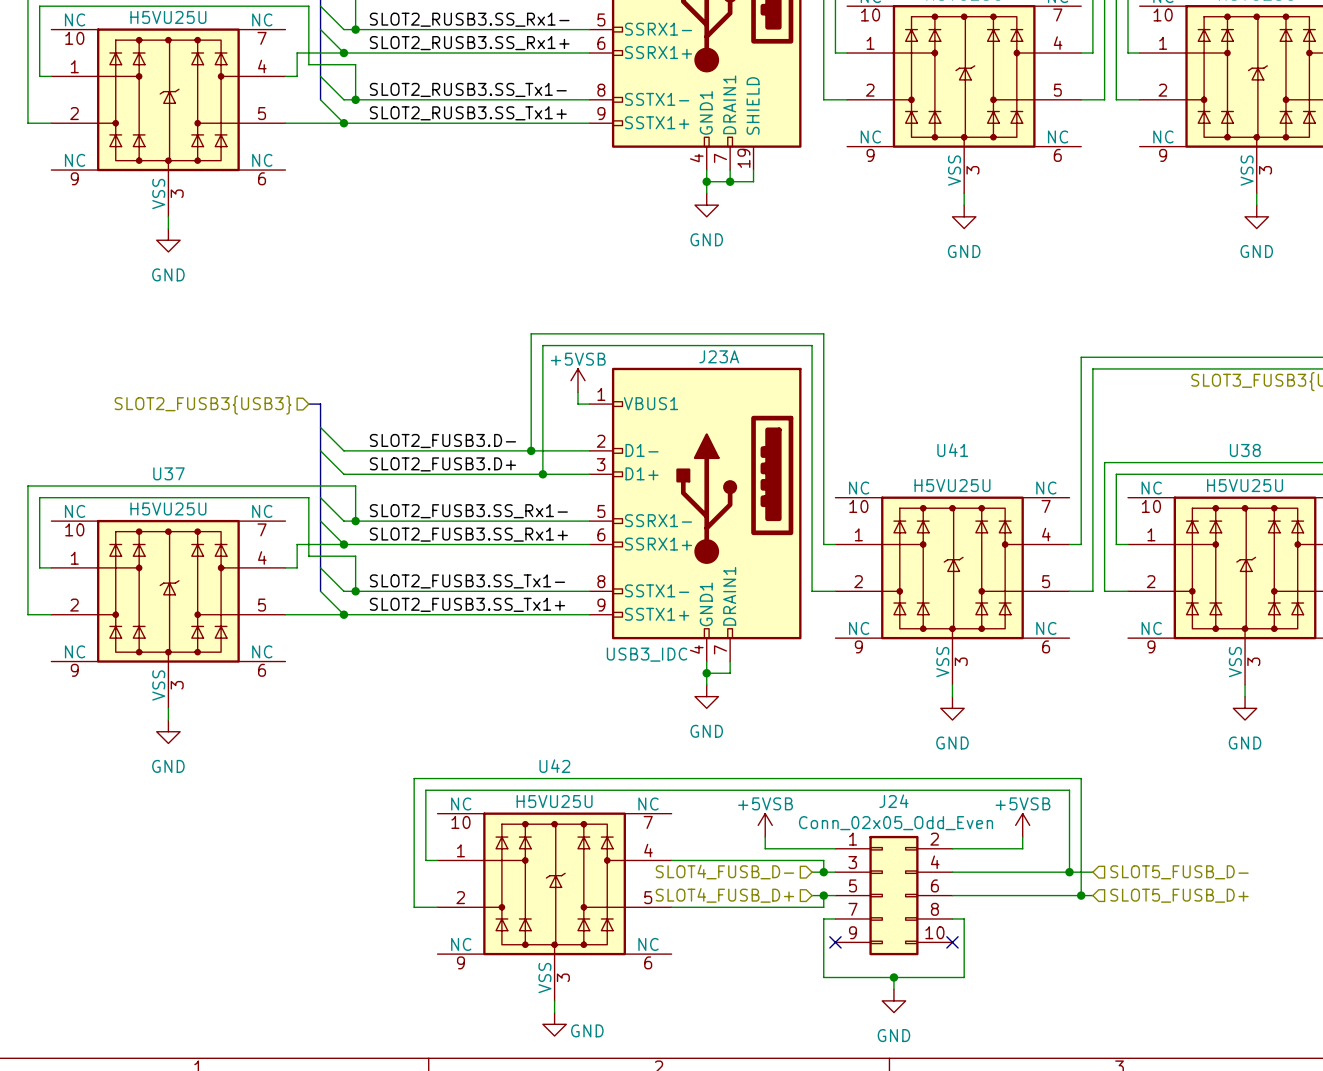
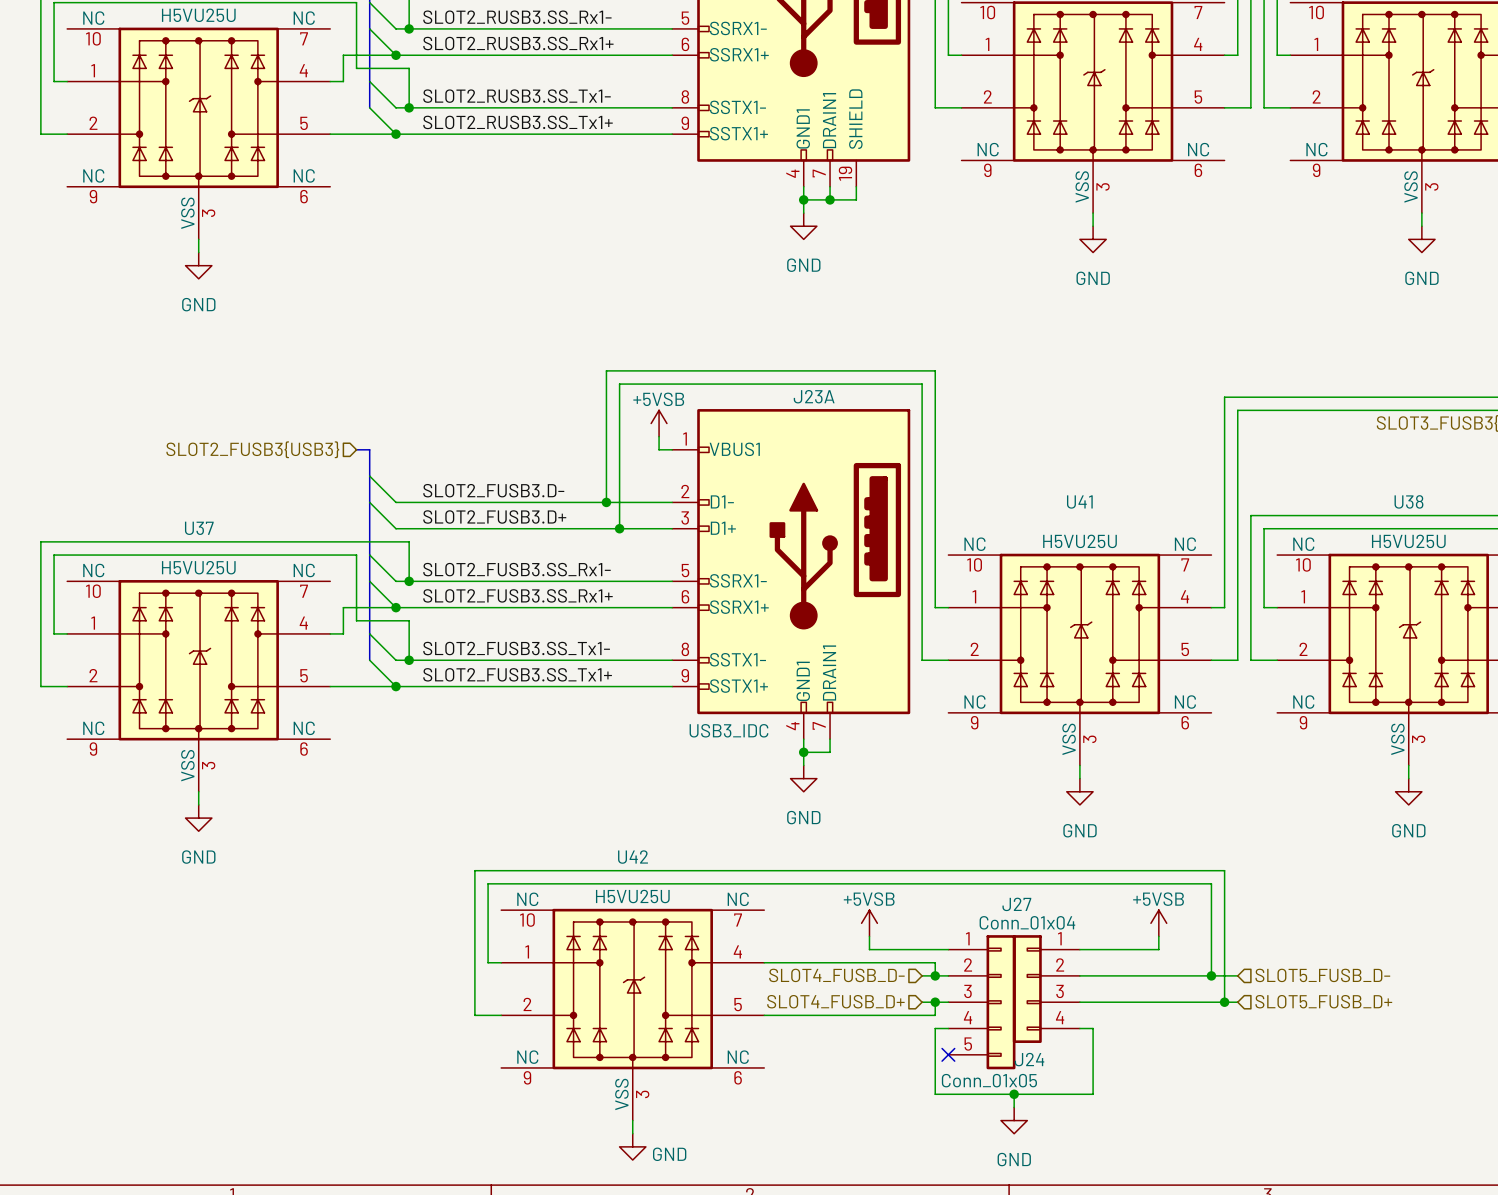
J24 name position: J24 (893, 801) -> J24 (1029, 1059)
J24 value: Conn_02x05_Odd_Even (896, 823) -> Conn_01x05 (989, 1080)
J24 symbol: [835, 835, 953, 956] -> [948, 935, 1016, 1070]
J27: none -> Conn_01x04 (1046, 989)
no-connect mark: (952, 942) -> none

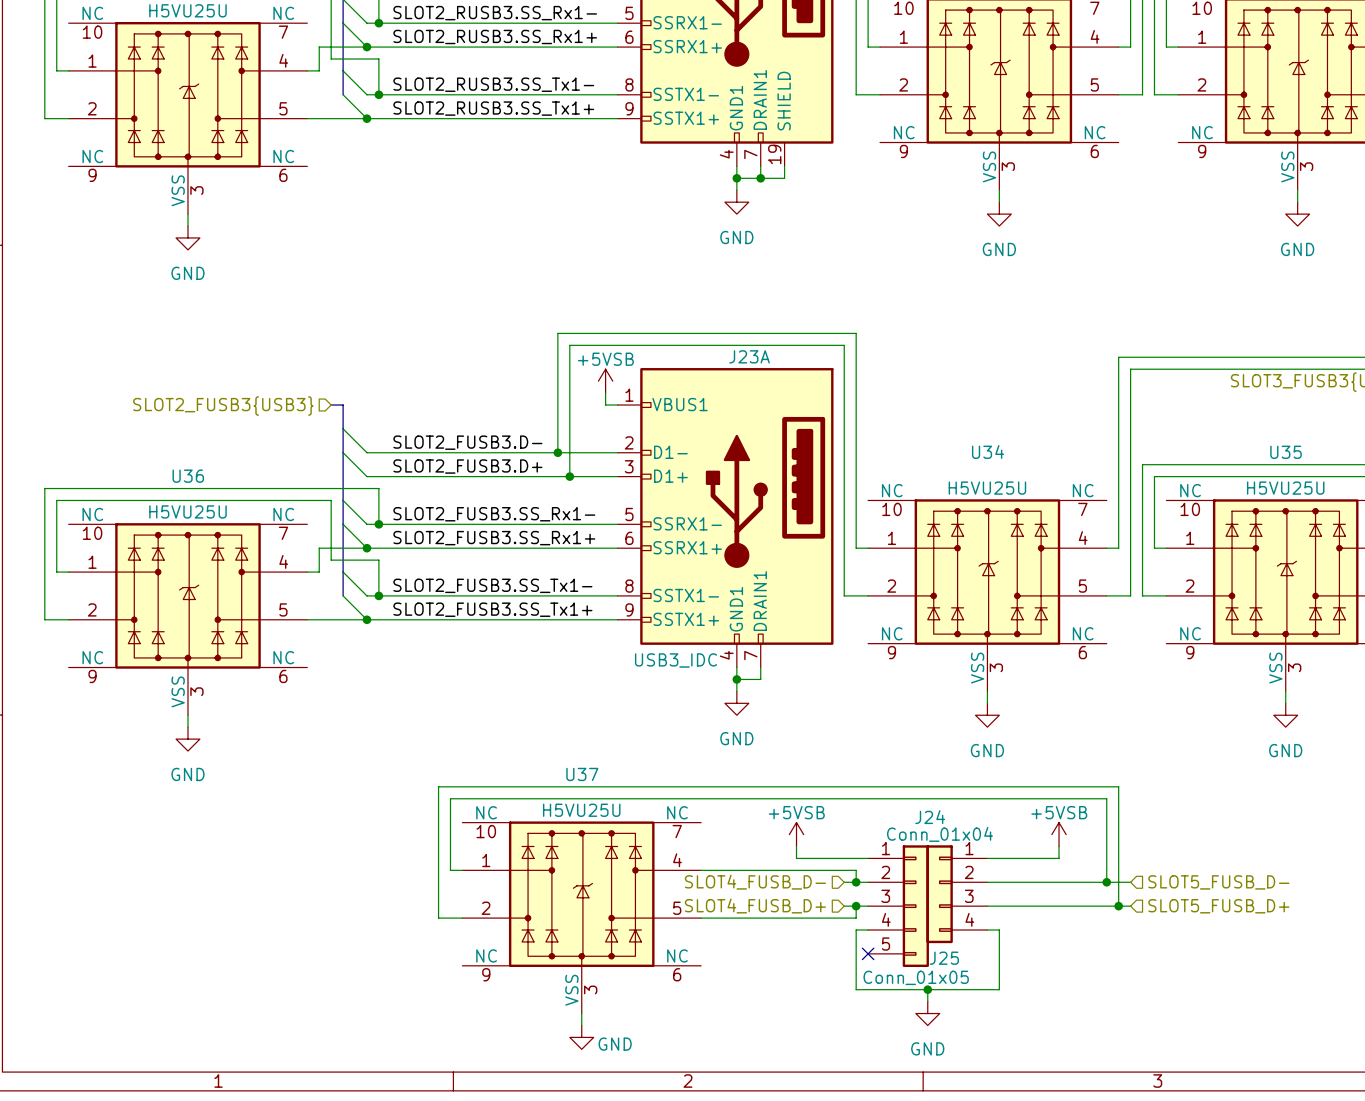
U38 name: U38 (1408, 501) -> U35 (1286, 452)
U41 name: U41 (1079, 502) -> U34 (987, 452)
U37 name: U37 (199, 528) -> U36 (188, 476)
U42 name: U42 (633, 857) -> U37 (582, 774)
J27 name: J27 (1016, 904) -> J24 (930, 817)
J24 name: J24 (1029, 1059) -> J25 (944, 958)

